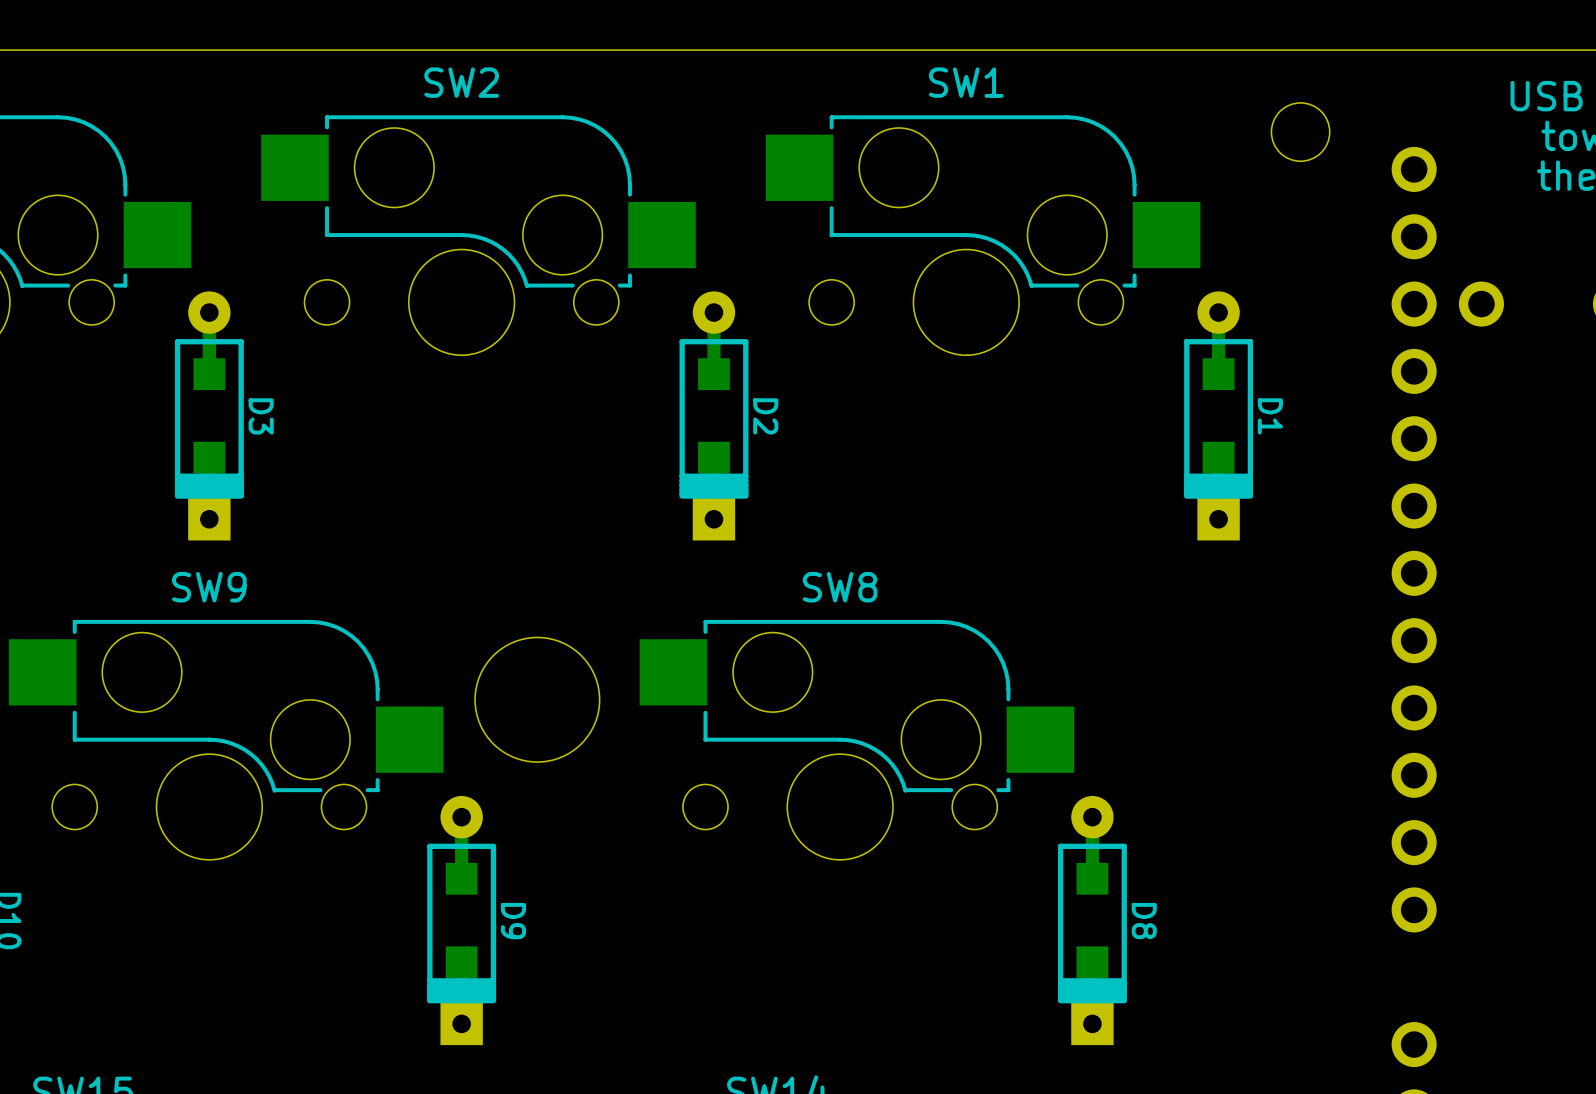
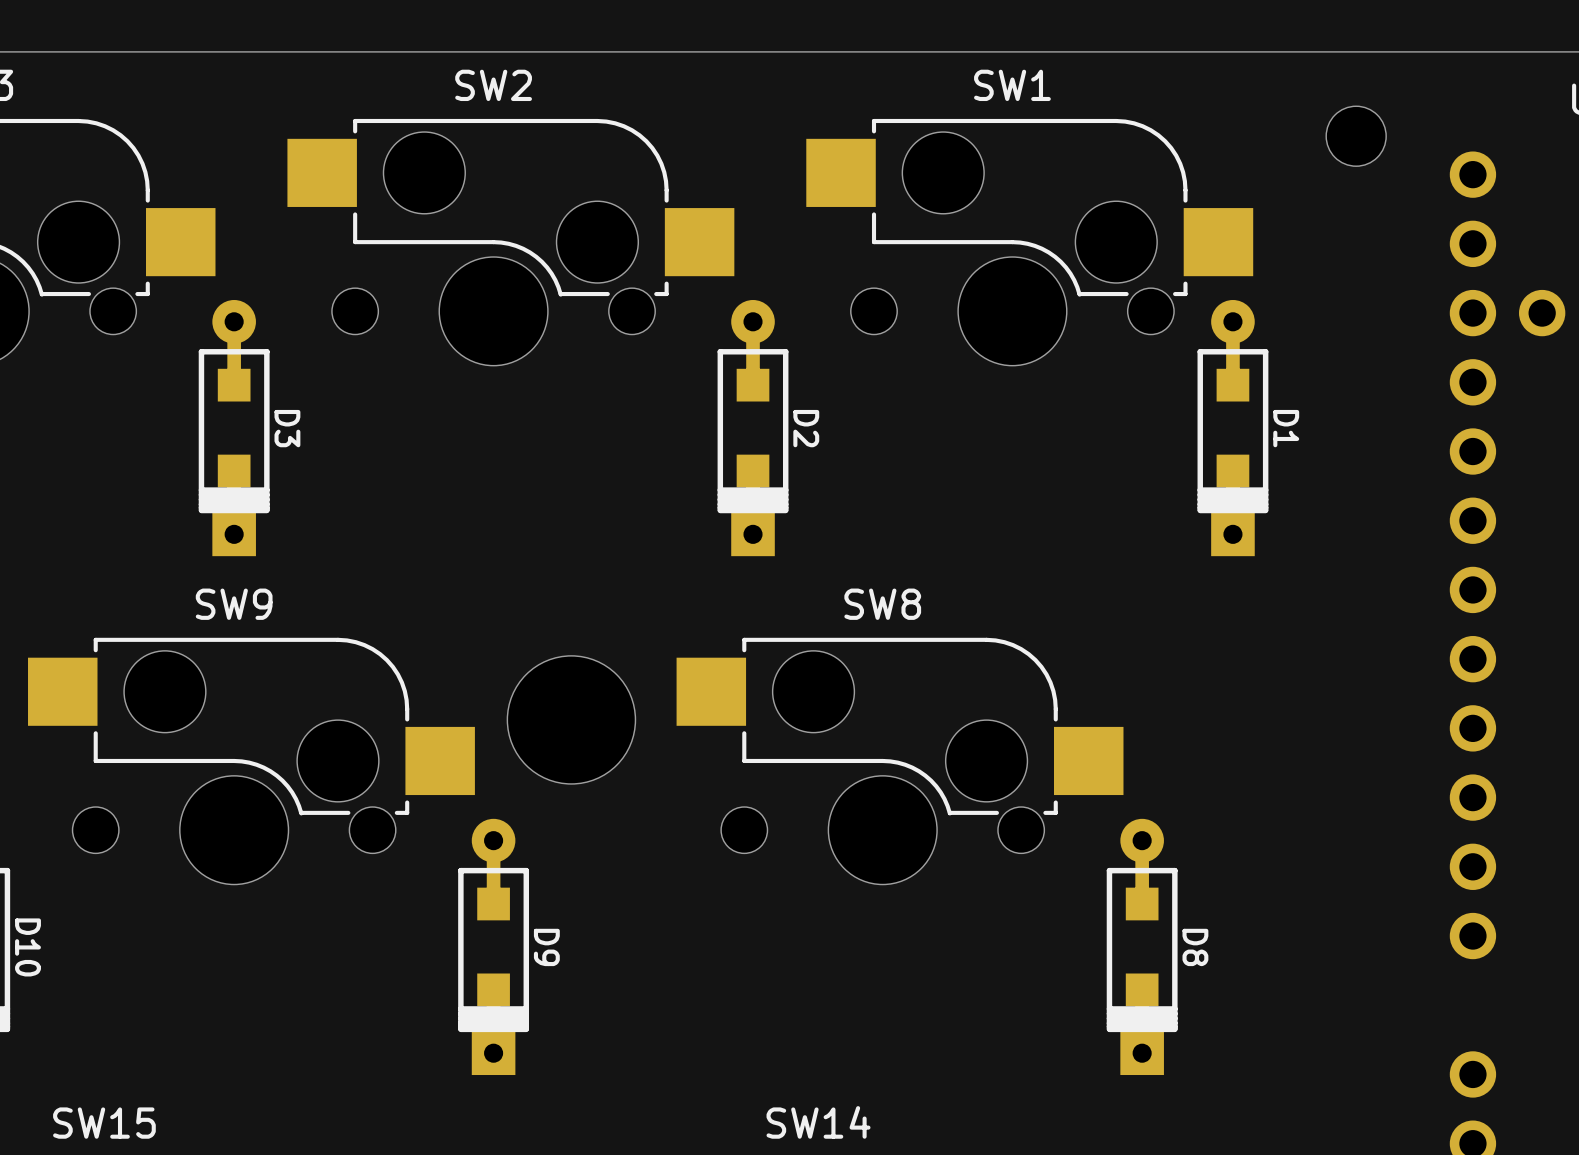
D1 position: (1218, 415) -> (1232, 428)

